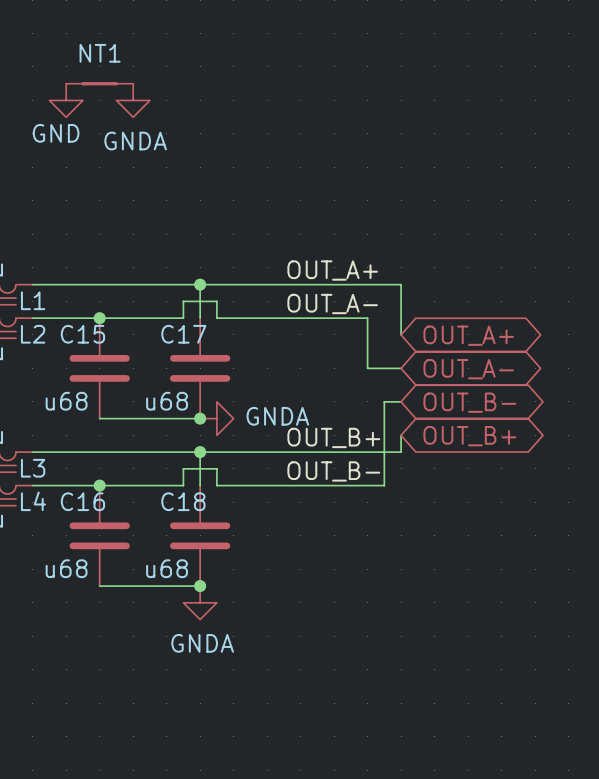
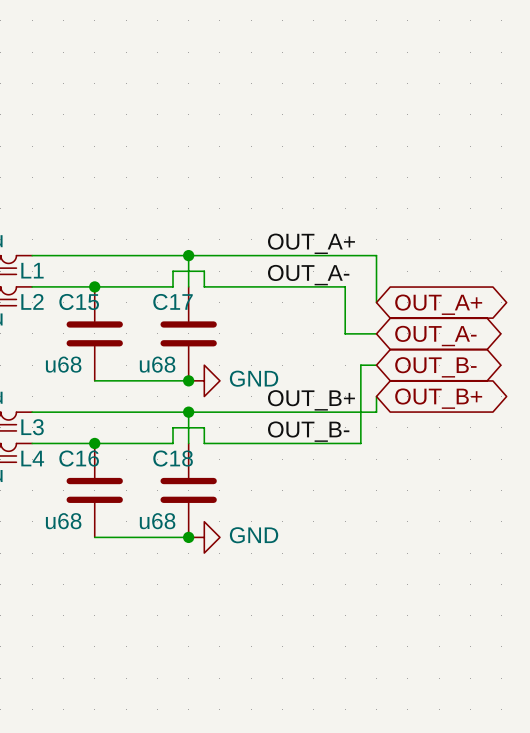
NT1: (99, 83) -> none
power symbol: GND (66, 100) -> none
power symbol: GNDA (133, 100) -> none
power symbol: GNDA (216, 418) -> GND (204, 380)
power symbol: none -> GND (204, 537)
power symbol: GNDA (200, 602) -> none

